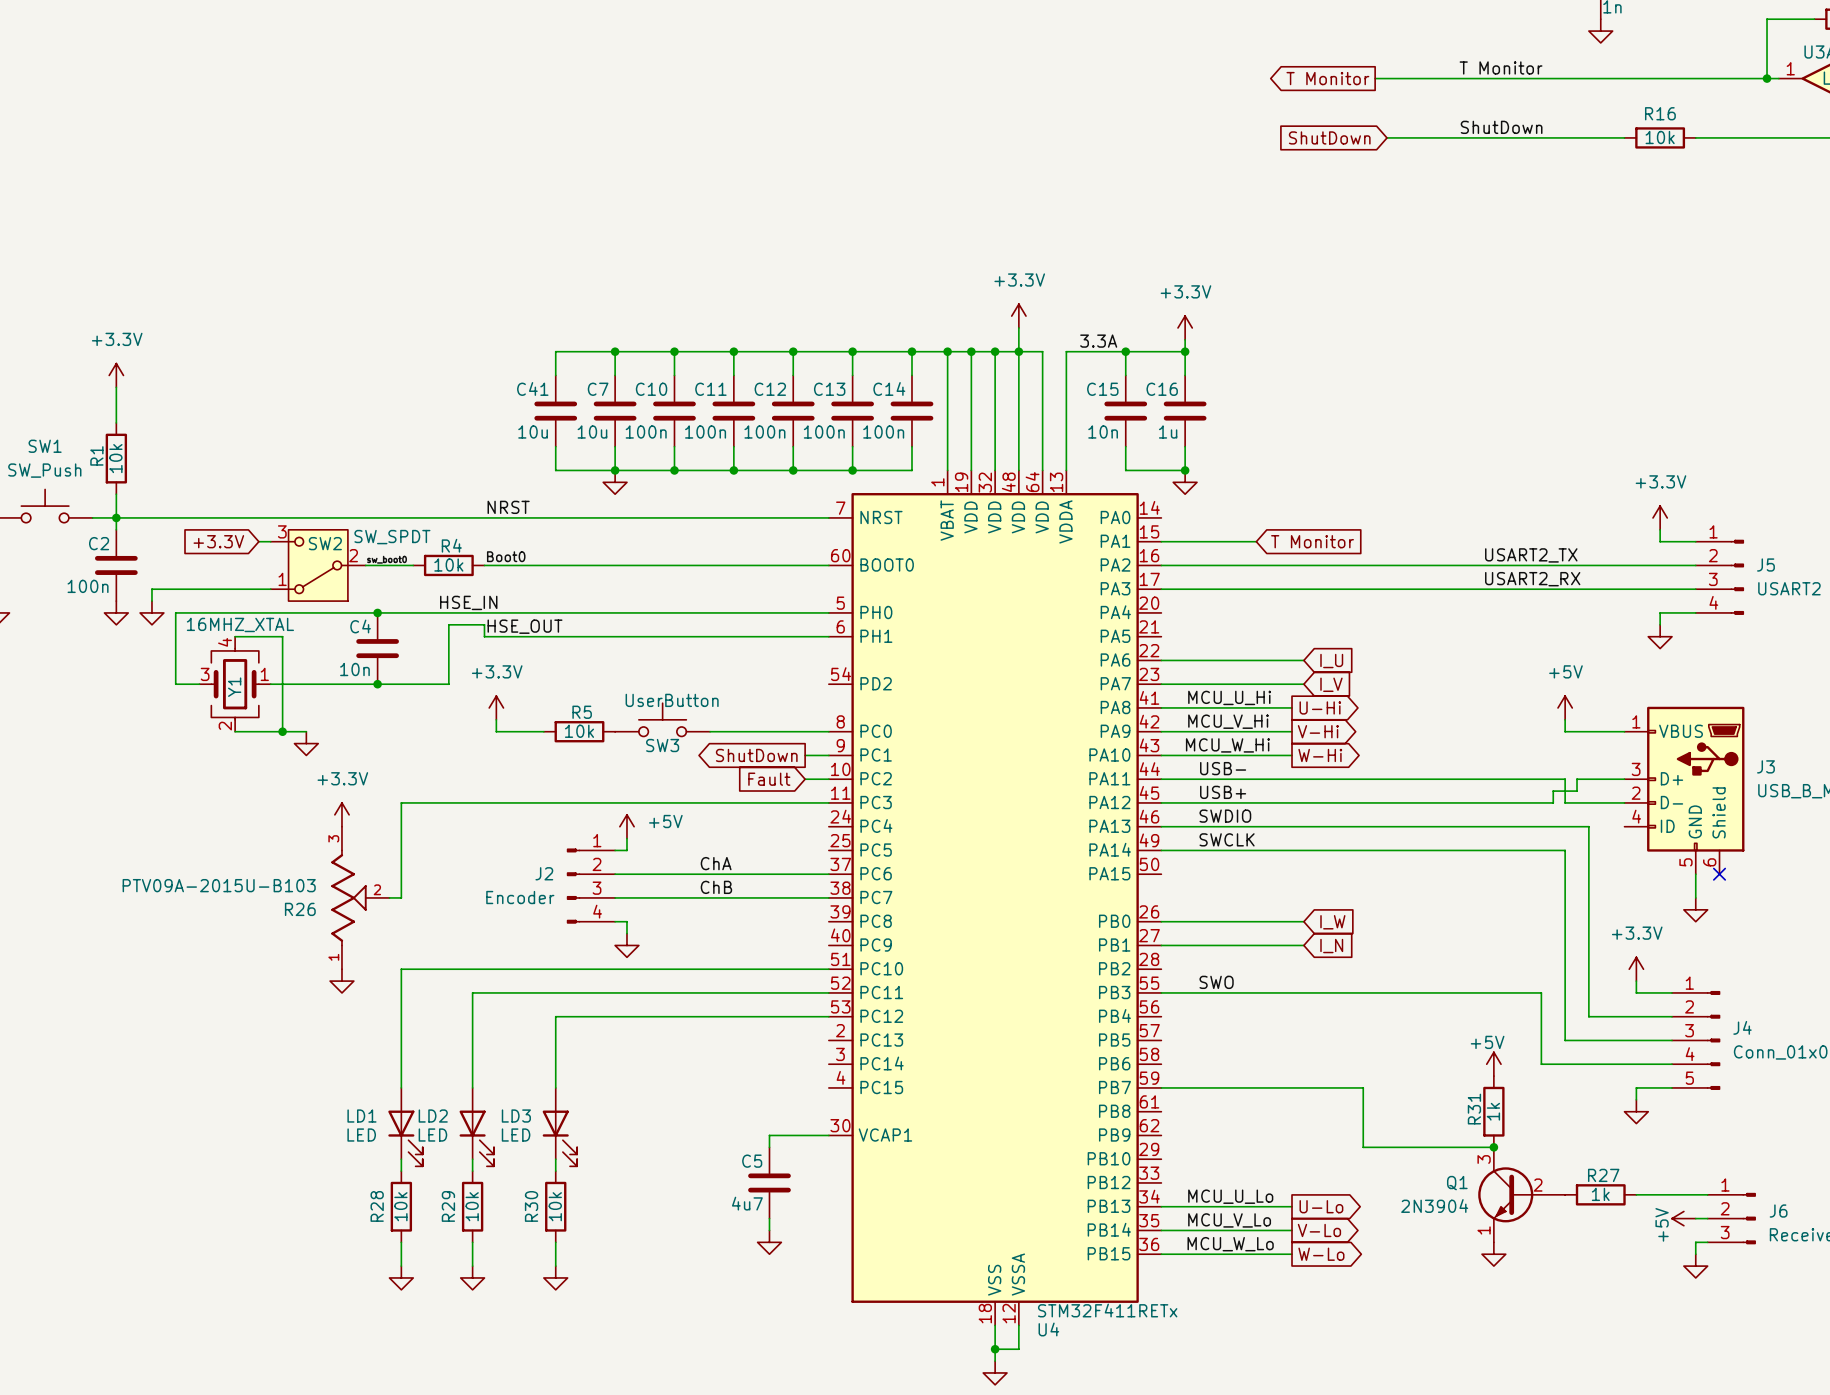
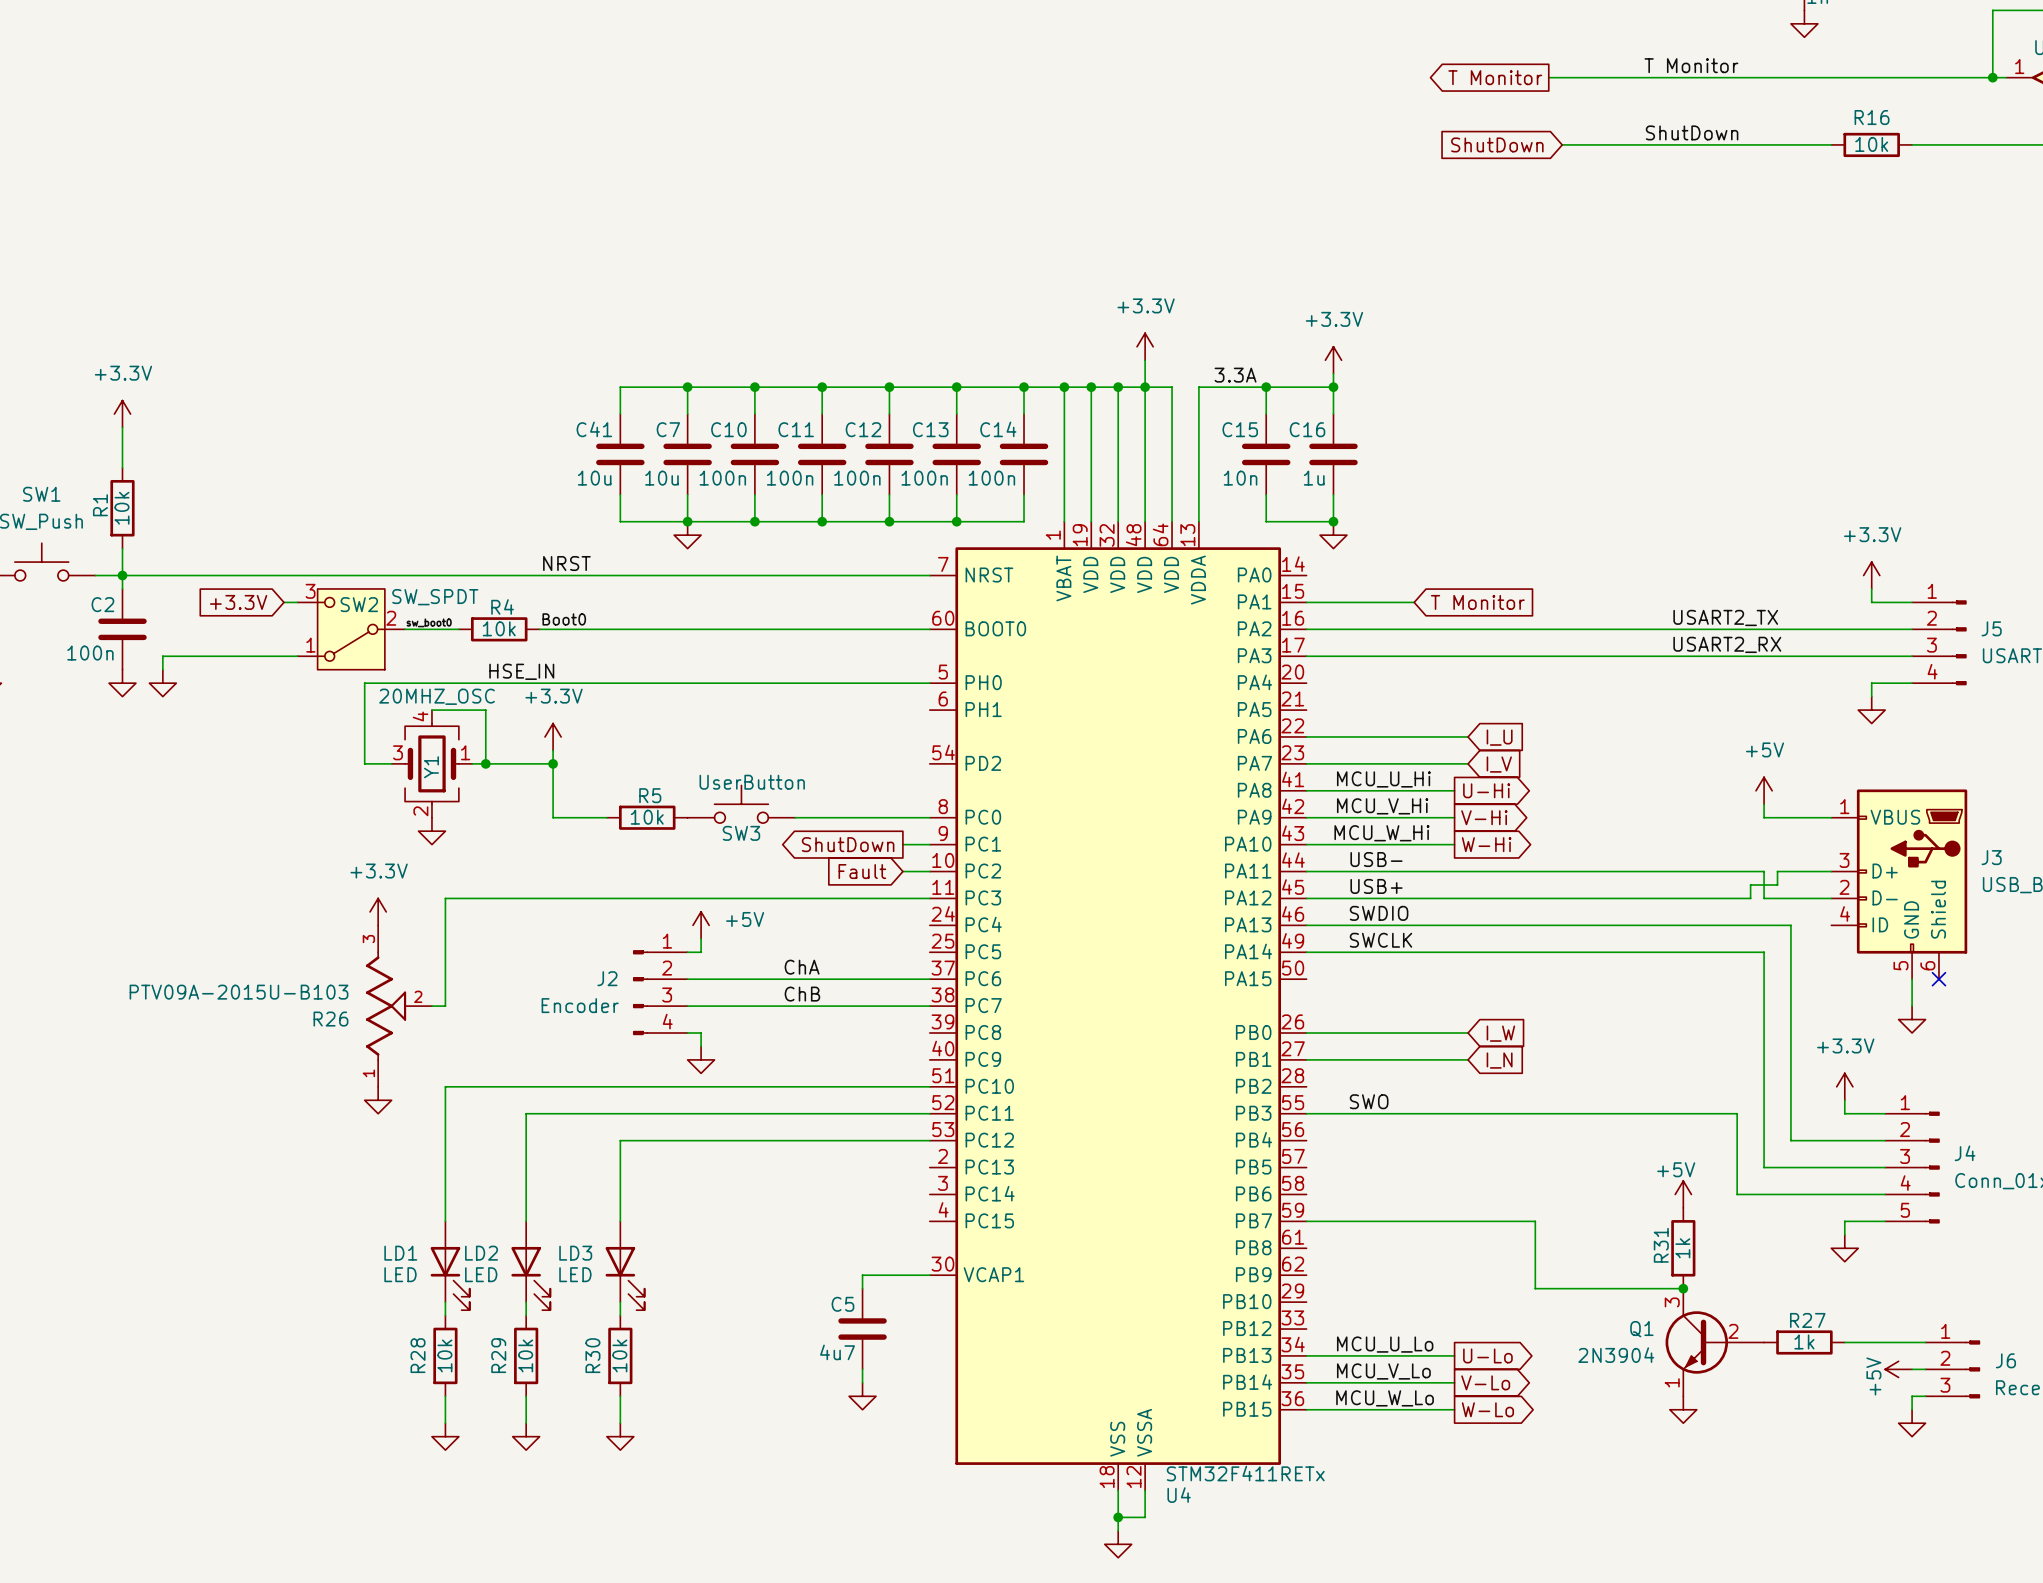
wire: (330, 612) (175, 612) (175, 684) (199, 684) -> none
junction: (377, 612) -> none
Y1 value: 16MHZ_XTAL (240, 624) -> 20MHZ_OSC (437, 696)
label: HSE_OUT (525, 626) -> none
wire: (235, 636) (282, 636) (282, 731) -> none
wire: none -> (431, 710) (485, 710) (485, 763)
wire: (828, 636) (484, 636) (484, 624) (448, 624) (448, 684) -> (553, 763) (499, 763)
C4: 10n (377, 648) -> none
Y1 position: (235, 684) -> (431, 763)
wire: (270, 684) (330, 684) -> (364, 683) (364, 763)
junction: (377, 684) -> none
junction: none -> (485, 763)
junction: none -> (553, 763)
power symbol position: +3.3V (496, 707) -> +3.3V (553, 736)
wire: (235, 731) (306, 731) -> none
junction: (282, 731) -> none
power symbol position: (306, 743) -> (431, 831)

